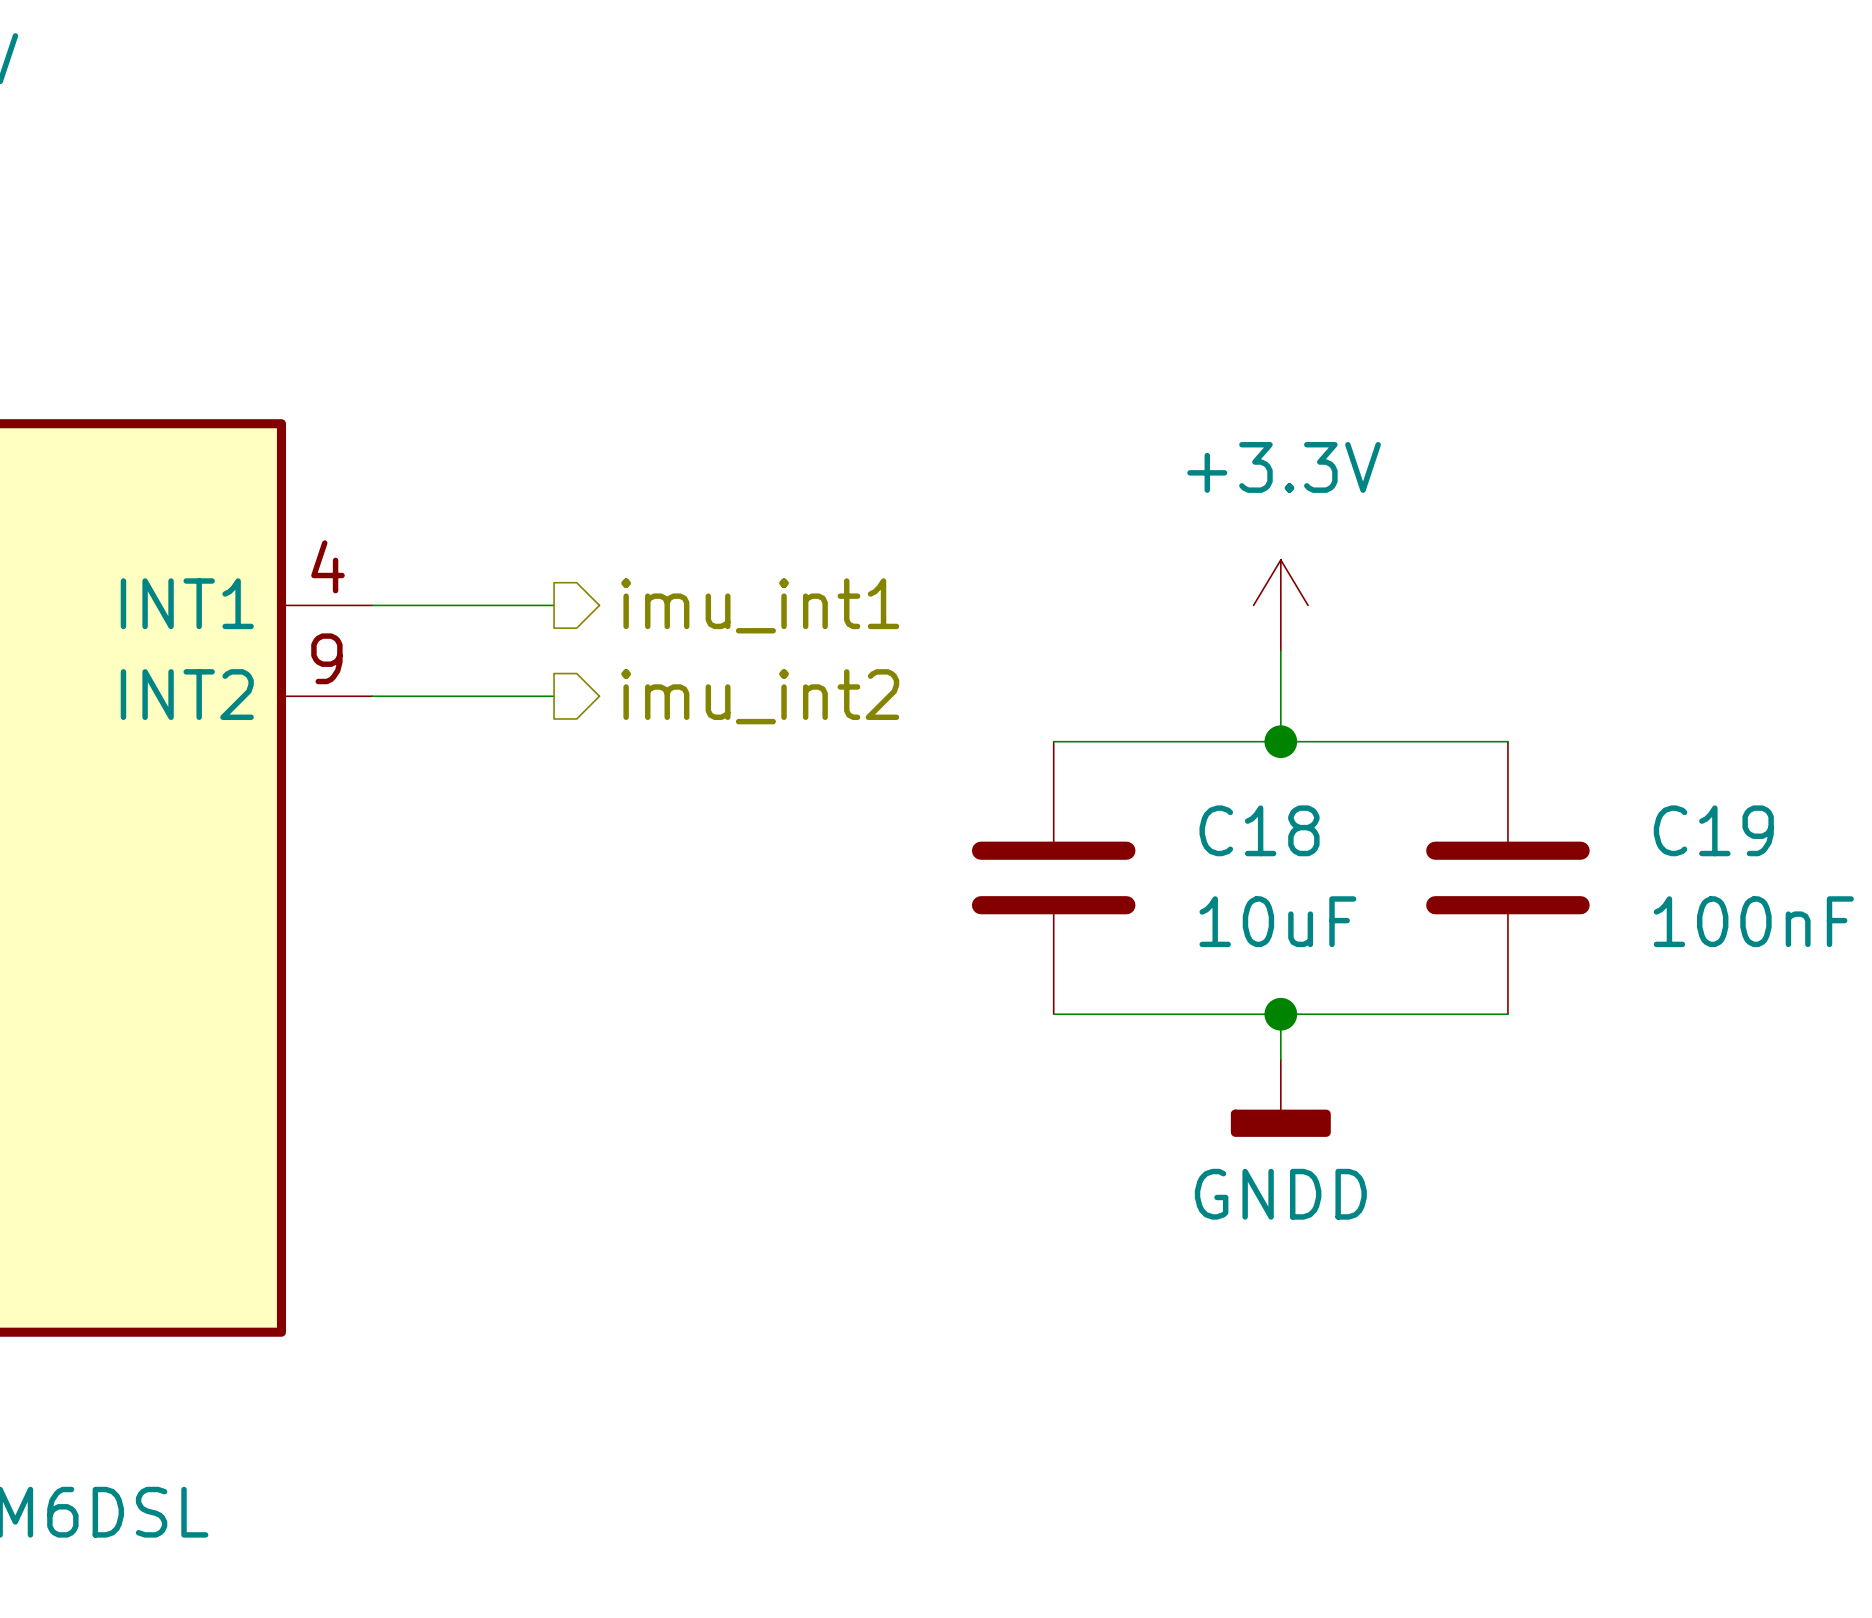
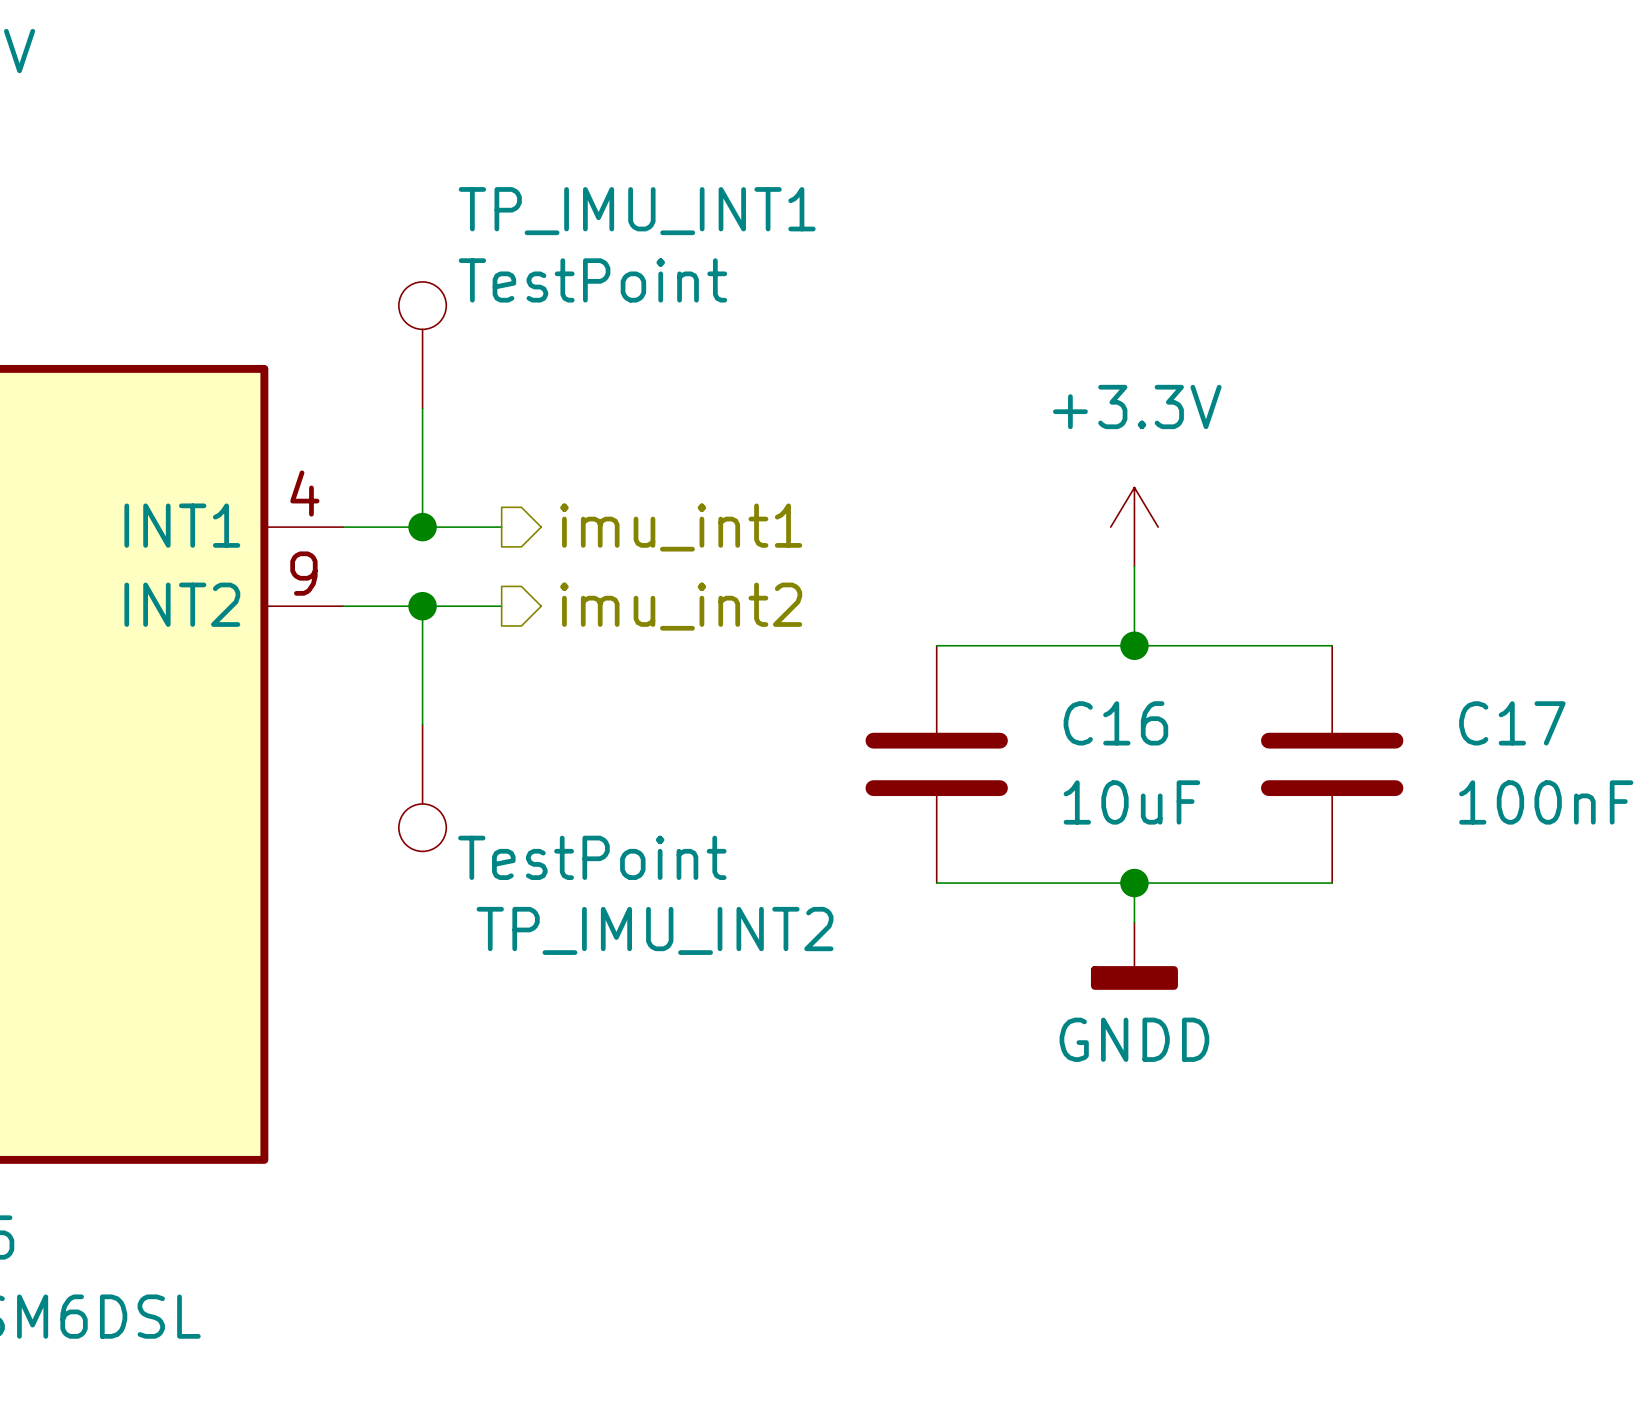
TP_IMU_INT1: none -> TestPoint (422, 345)
wire: none -> (422, 408) (422, 527)
junction: none -> (422, 527)
wire: none -> (422, 606) (422, 724)
junction: none -> (422, 606)
C18 name: C18 (1259, 830) -> C16 (1115, 723)
C19 name: C19 (1713, 830) -> C17 (1512, 723)
TP_IMU_INT2: none -> TestPoint (422, 788)

